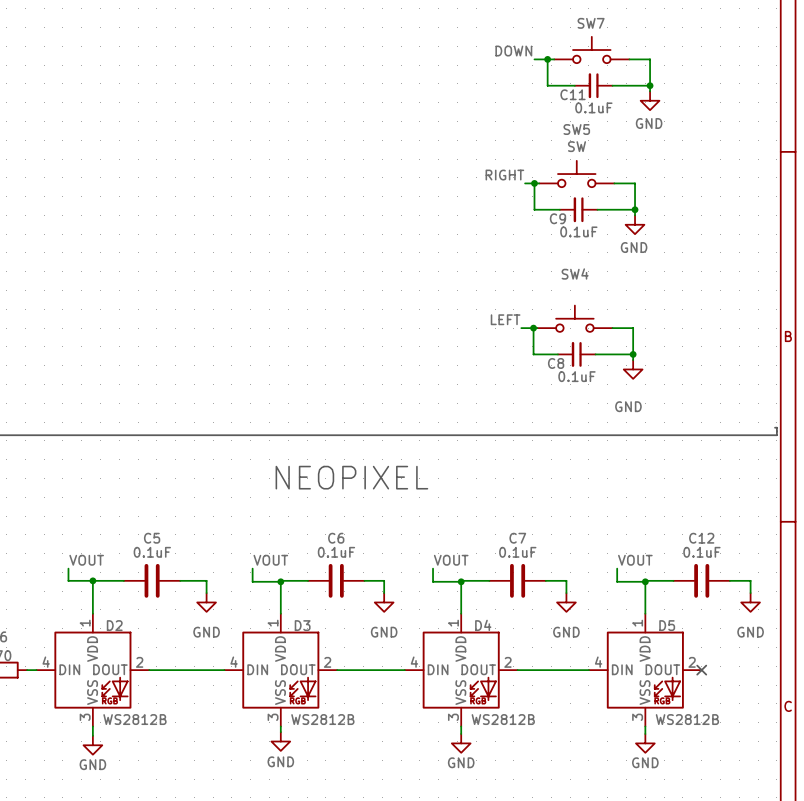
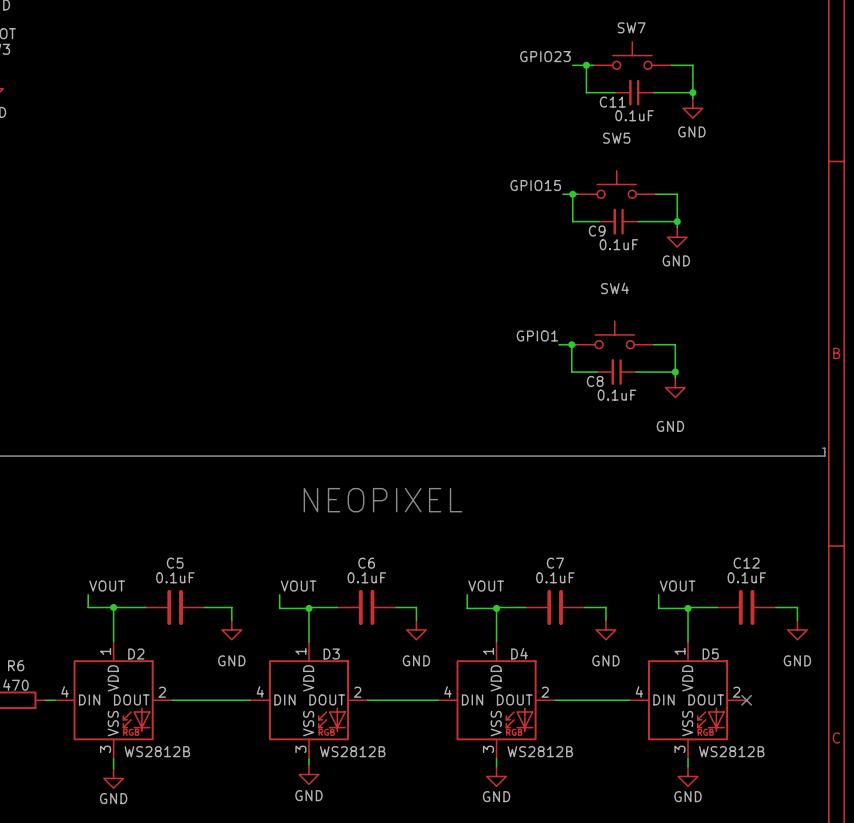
label: DOWN (513, 51) -> GPIO23 (545, 56)
SW5 value: SW (576, 146) -> none
label: RIGHT (504, 175) -> GPIO15 (535, 185)
label: LEFT (505, 319) -> GPIO1 (537, 335)

